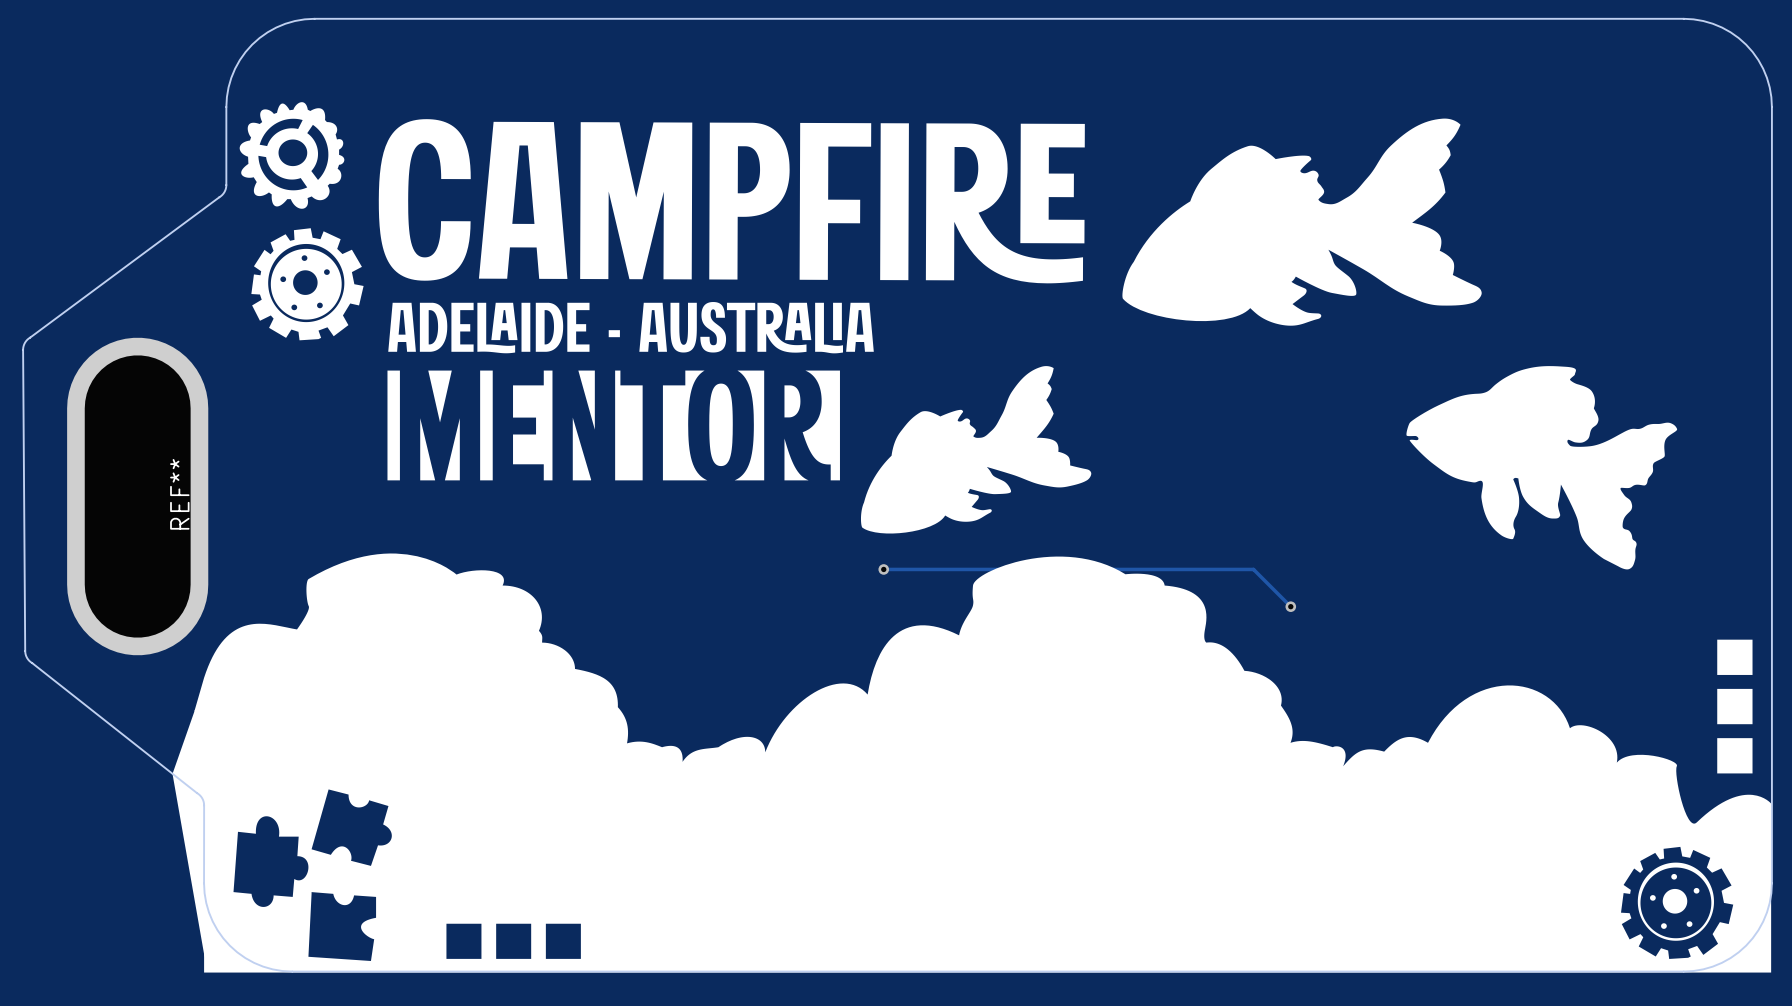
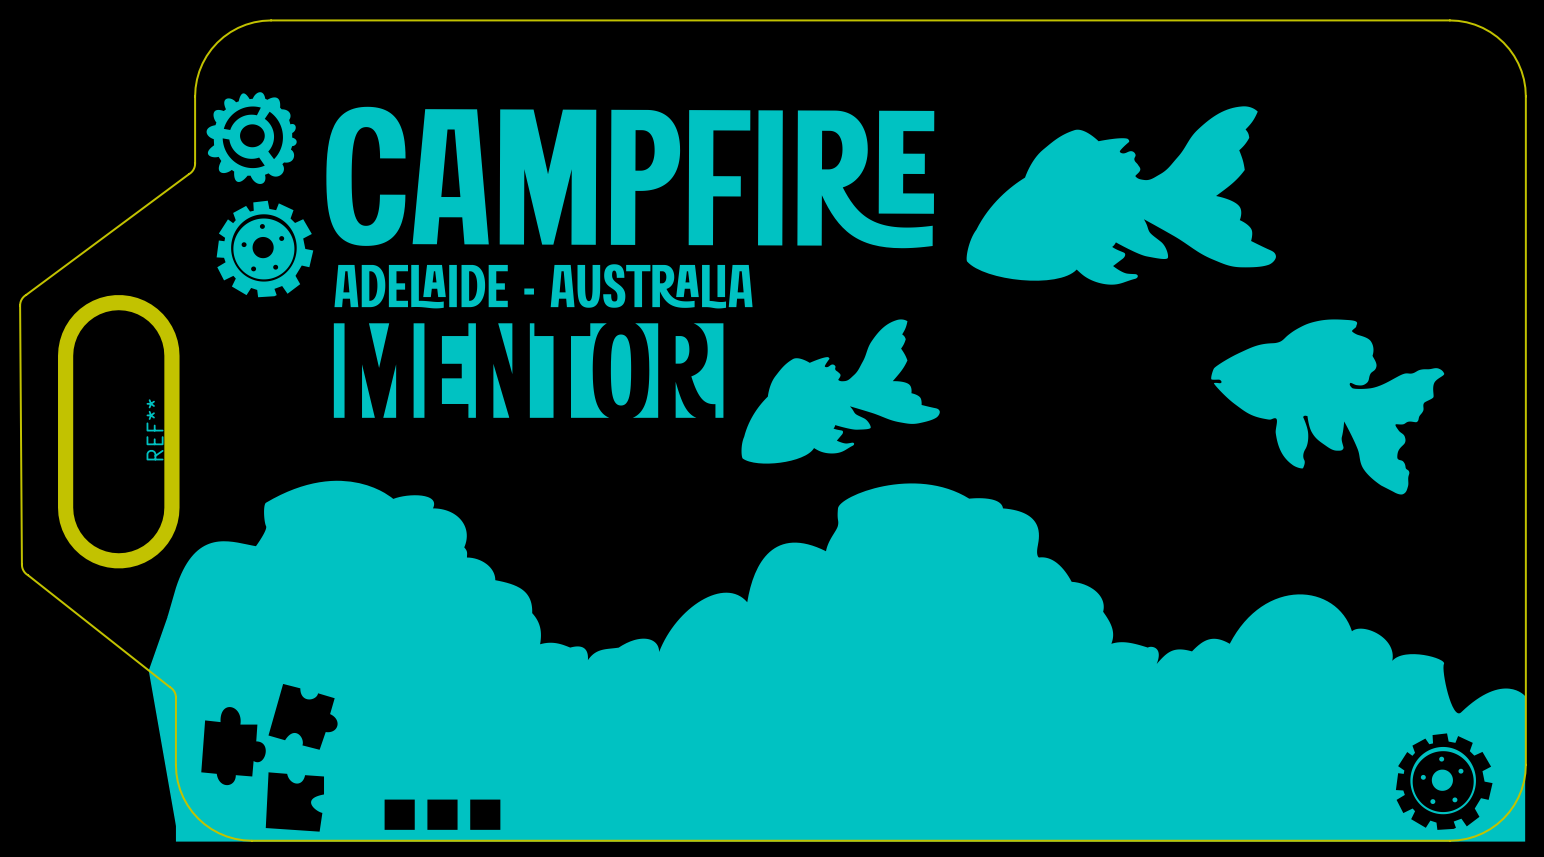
track: (883, 569) (1253, 569) (1290, 606) -> none
via: (883, 569) -> none
via: (1290, 606) -> none
drawing: [1717, 639, 1753, 774] -> none

